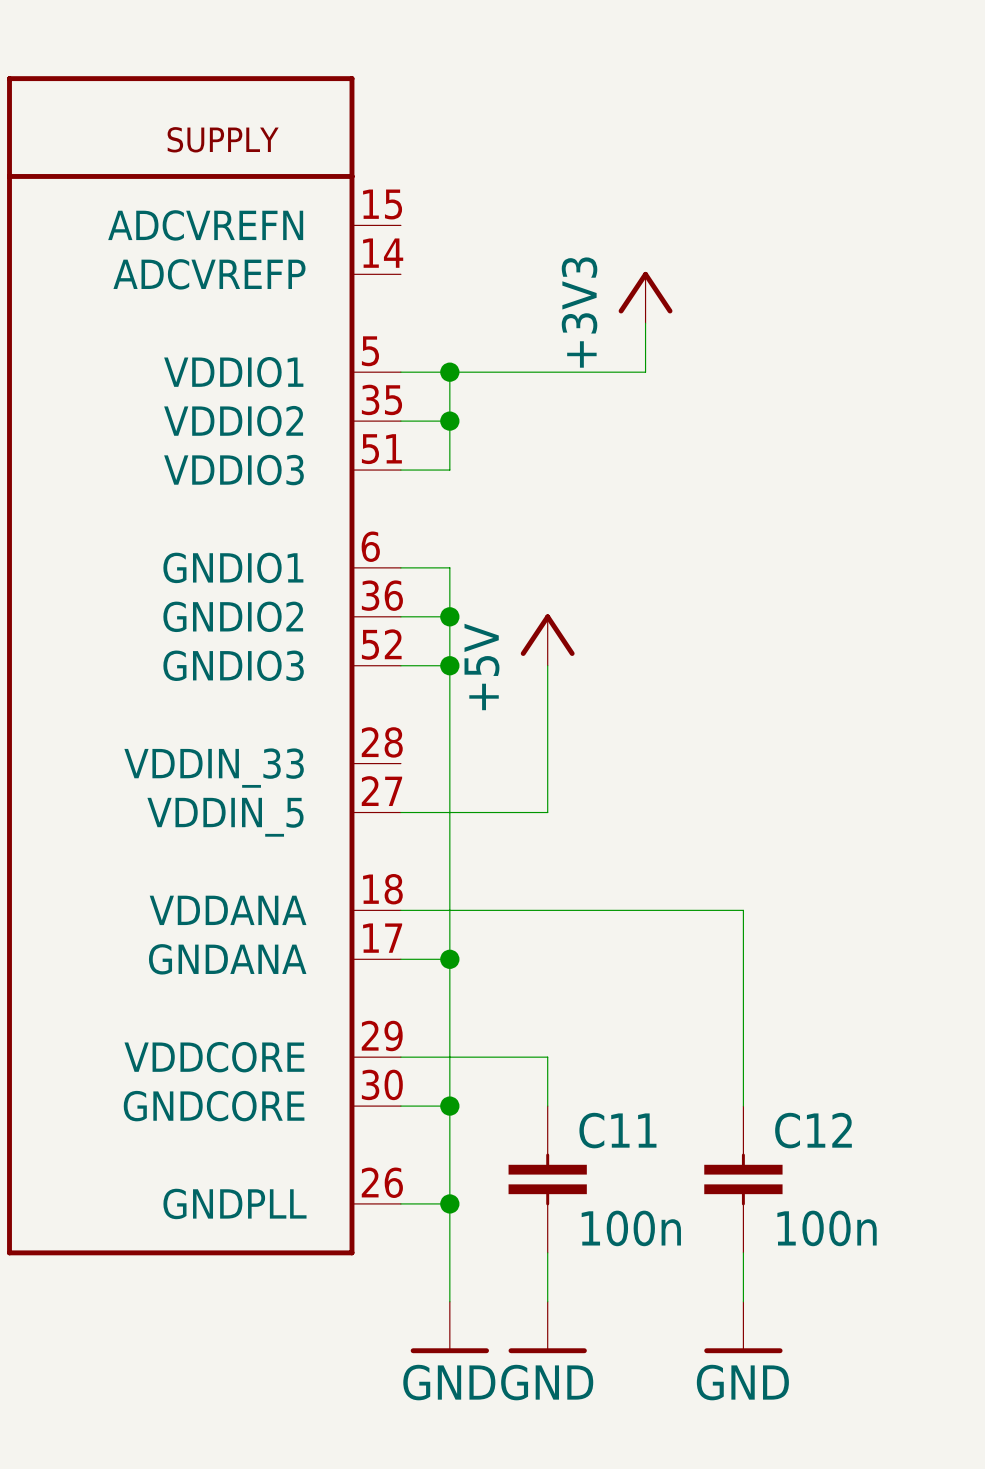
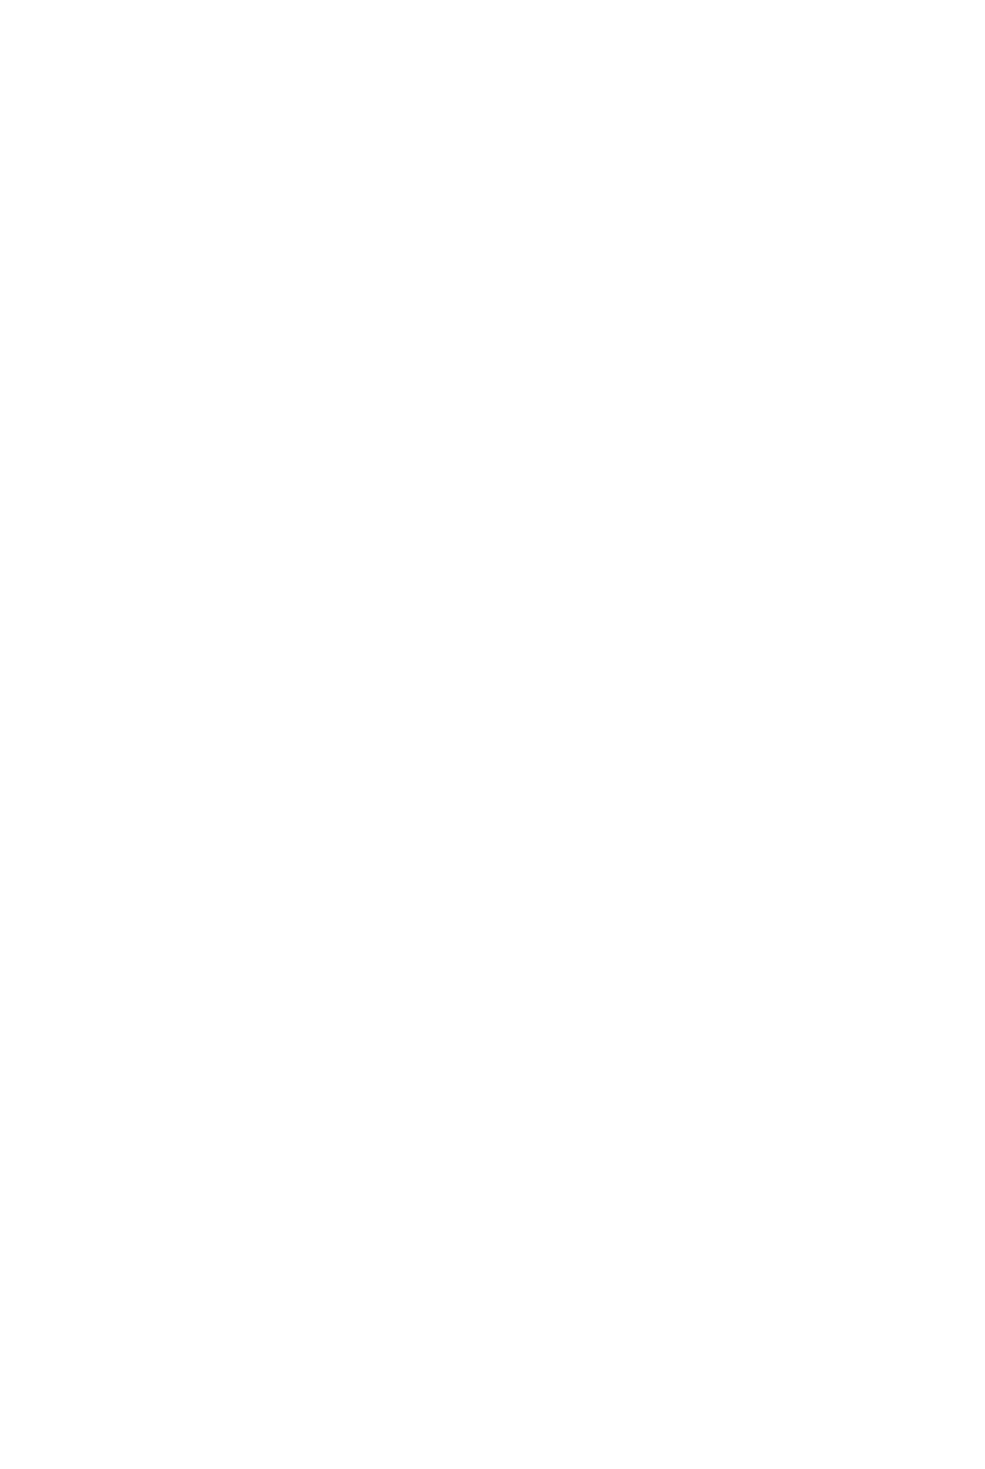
power symbol: +3V3 (645, 297) -> none
wire: (645, 323) (645, 372) (400, 372) -> none
wire: (449, 372) (449, 470) (400, 470) -> none
junction: (449, 372) -> none
wire: (400, 421) (449, 421) -> none
junction: (449, 421) -> none
wire: (400, 567) (449, 567) (449, 1301) -> none
wire: (400, 616) (449, 616) -> none
junction: (449, 616) -> none
power symbol: +5V (547, 640) -> none
part: (203, 665) -> none
wire: (400, 665) (449, 665) -> none
junction: (449, 665) -> none
wire: (547, 665) (547, 812) (400, 812) -> none
wire: (400, 910) (743, 910) (743, 1106) -> none
wire: (400, 959) (449, 959) -> none
junction: (449, 959) -> none
wire: (400, 1057) (547, 1057) (547, 1106) -> none
wire: (400, 1106) (449, 1106) -> none
junction: (449, 1106) -> none
C11: 100n (547, 1179) -> none
C12: 100n (743, 1179) -> none
wire: (400, 1203) (449, 1203) -> none
junction: (449, 1203) -> none
wire: (547, 1252) (547, 1301) -> none
wire: (743, 1252) (743, 1301) -> none
power symbol: GND (449, 1327) -> none
power symbol: GND (547, 1327) -> none
power symbol: GND (743, 1327) -> none

